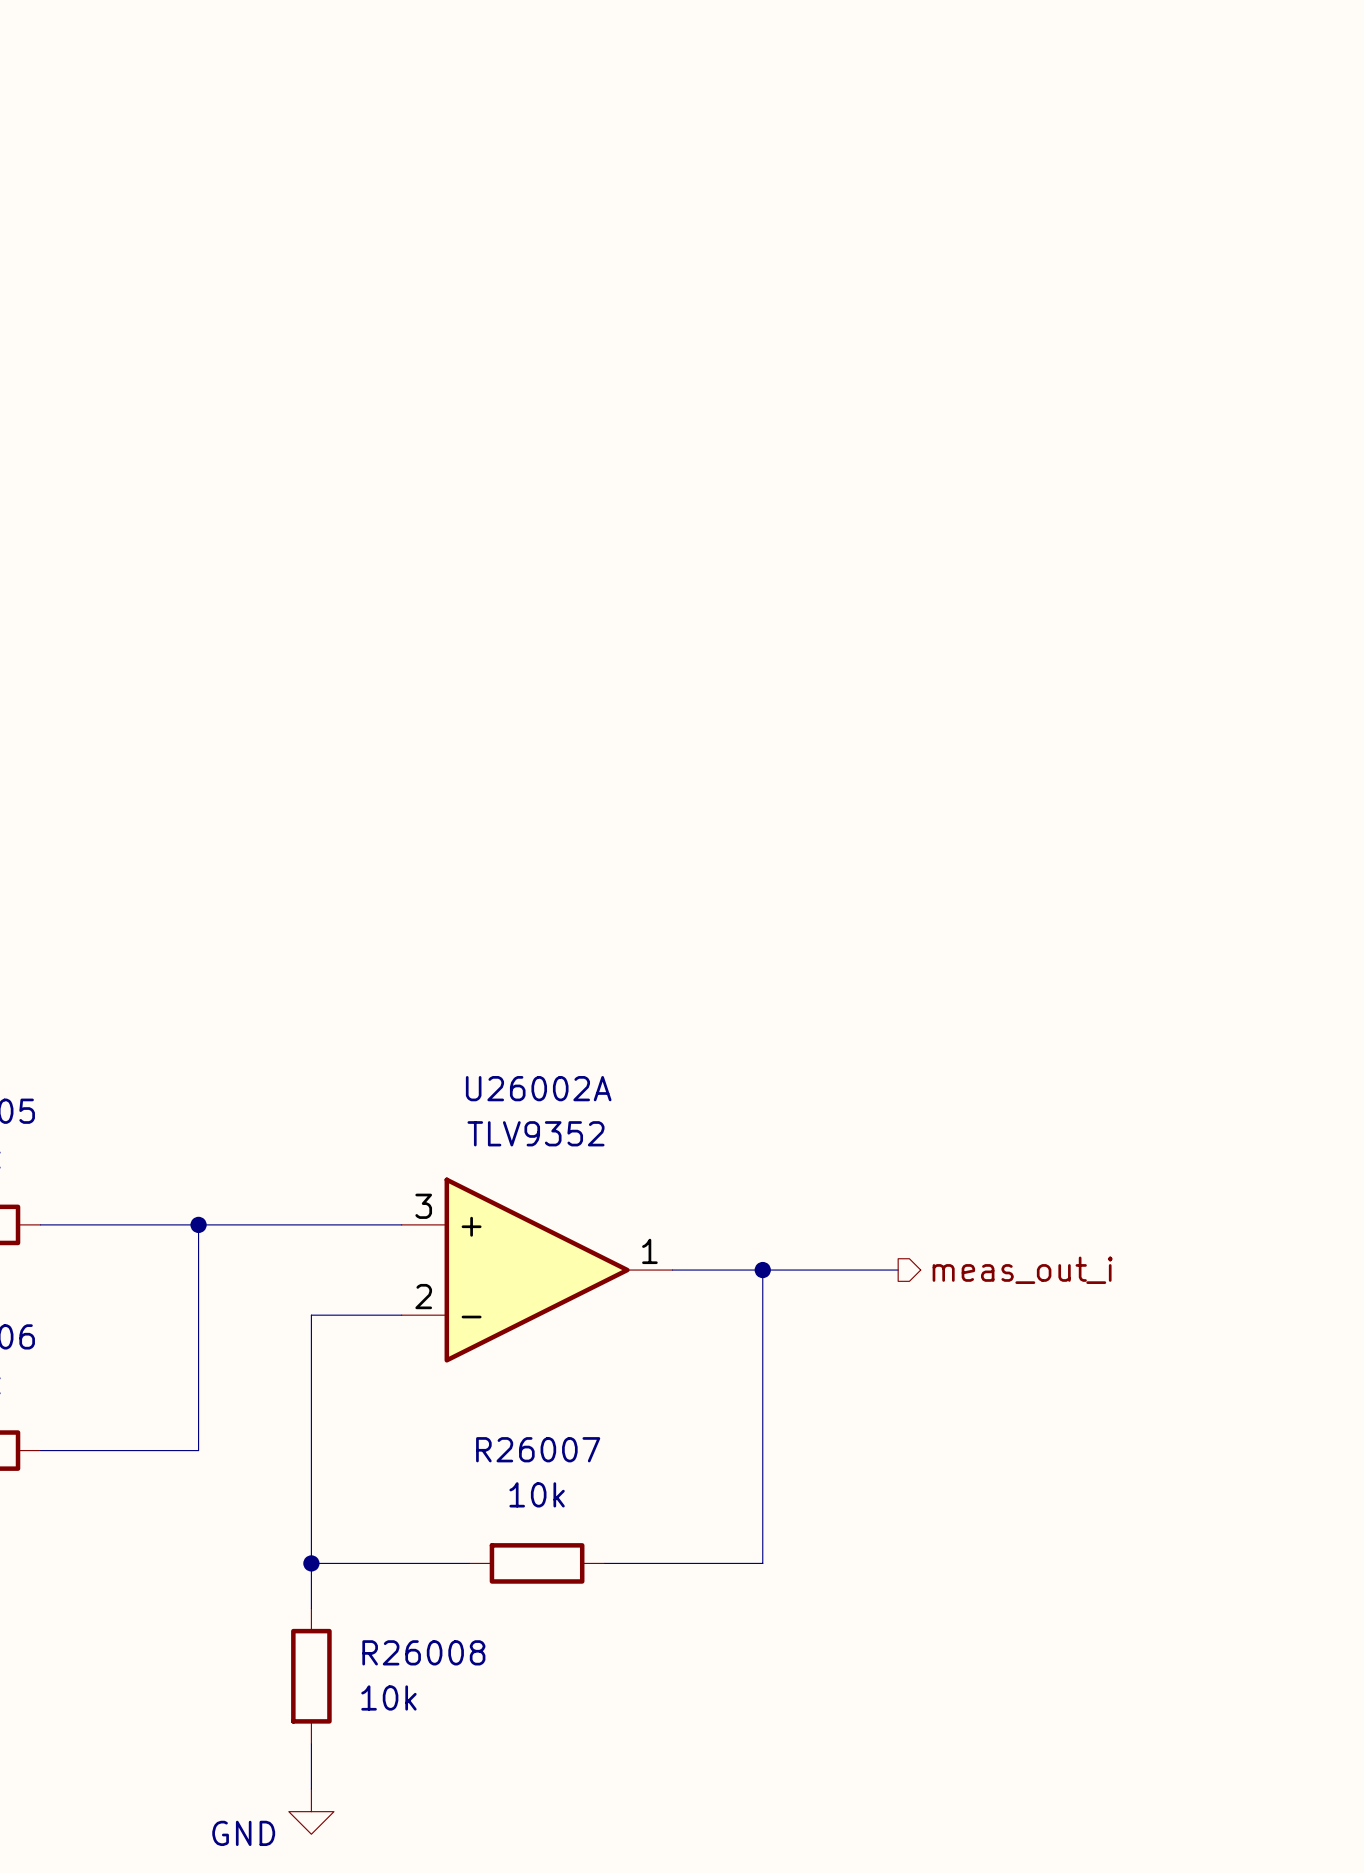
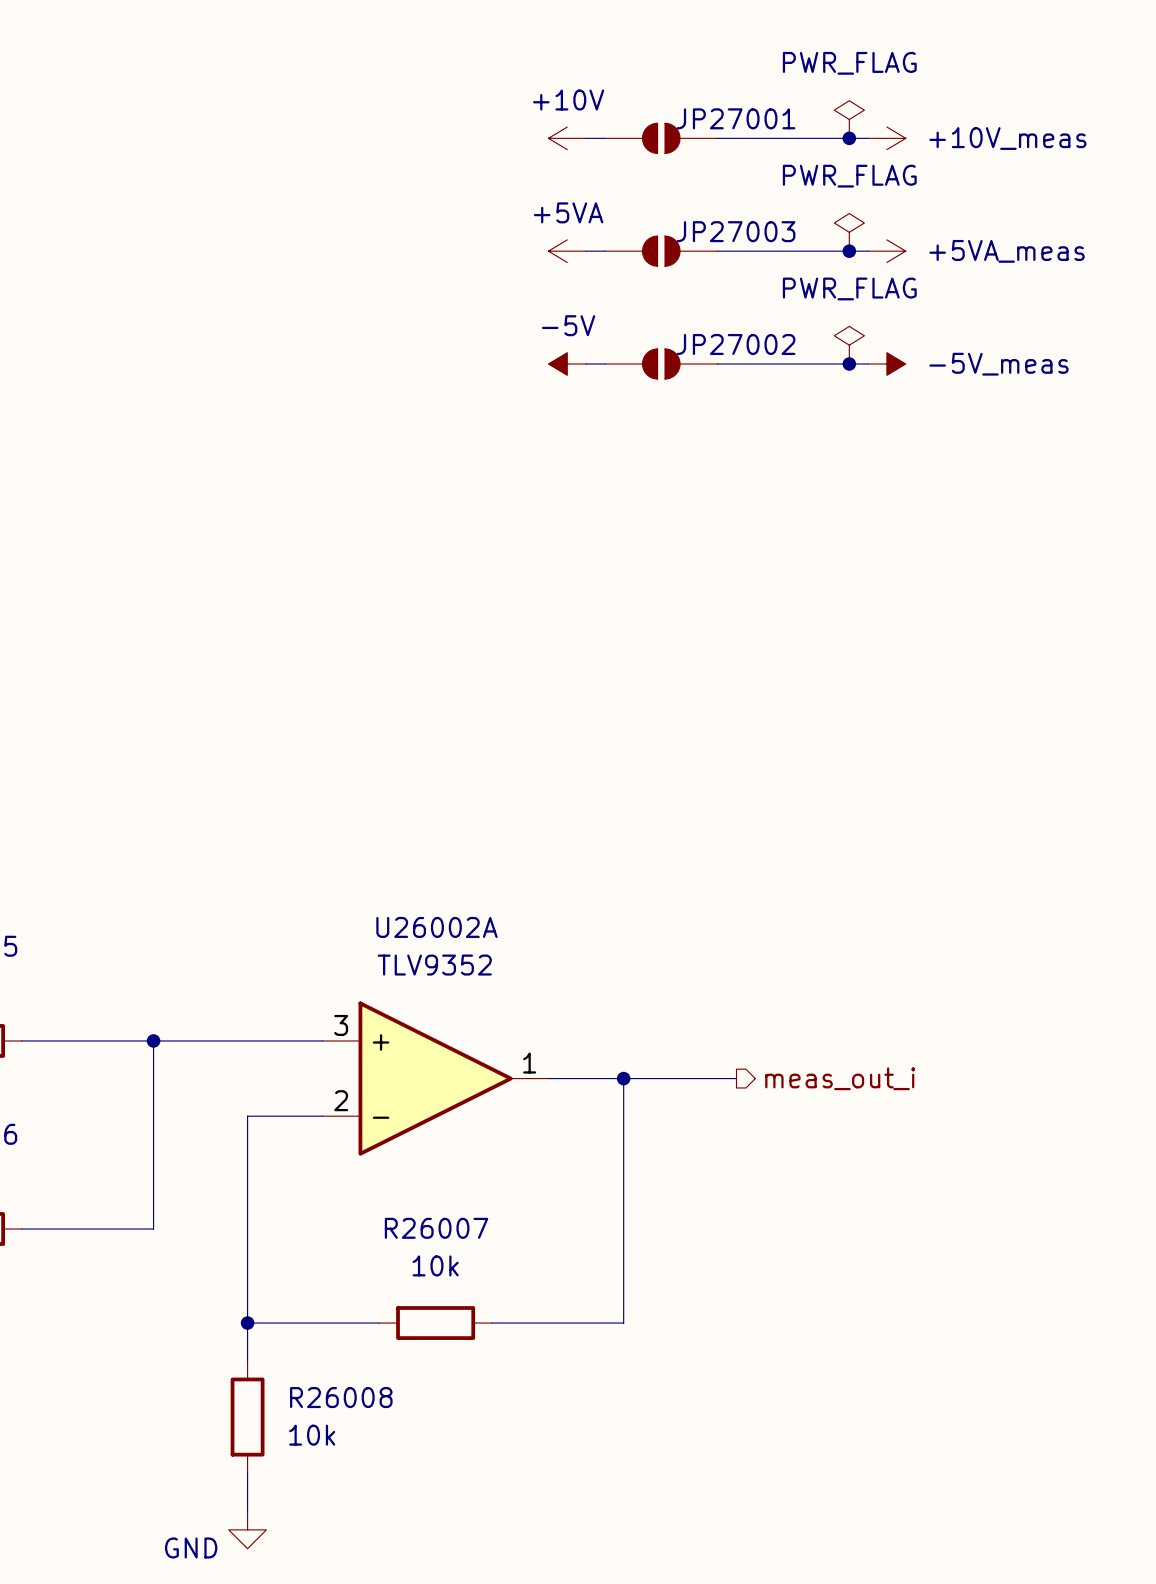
power symbol: none -> PWR_FLAG (849, 119)
power symbol: none -> +10V (567, 138)
wire: none -> (586, 138) (604, 138)
JP27001: none -> (661, 138)
wire: none -> (717, 138) (868, 138)
junction: none -> (849, 138)
power symbol: none -> +10V_meas (886, 138)
power symbol: none -> PWR_FLAG (849, 232)
power symbol: none -> +5VA (567, 251)
wire: none -> (586, 251) (604, 251)
JP27003: none -> (661, 251)
wire: none -> (717, 251) (868, 251)
junction: none -> (849, 251)
power symbol: none -> +5VA_meas (886, 251)
power symbol: none -> PWR_FLAG (849, 345)
power symbol: none -> -5V (567, 364)
wire: none -> (586, 364) (604, 364)
JP27002: none -> (661, 364)
wire: none -> (717, 364) (868, 364)
junction: none -> (849, 364)
power symbol: none -> -5V_meas (886, 364)

